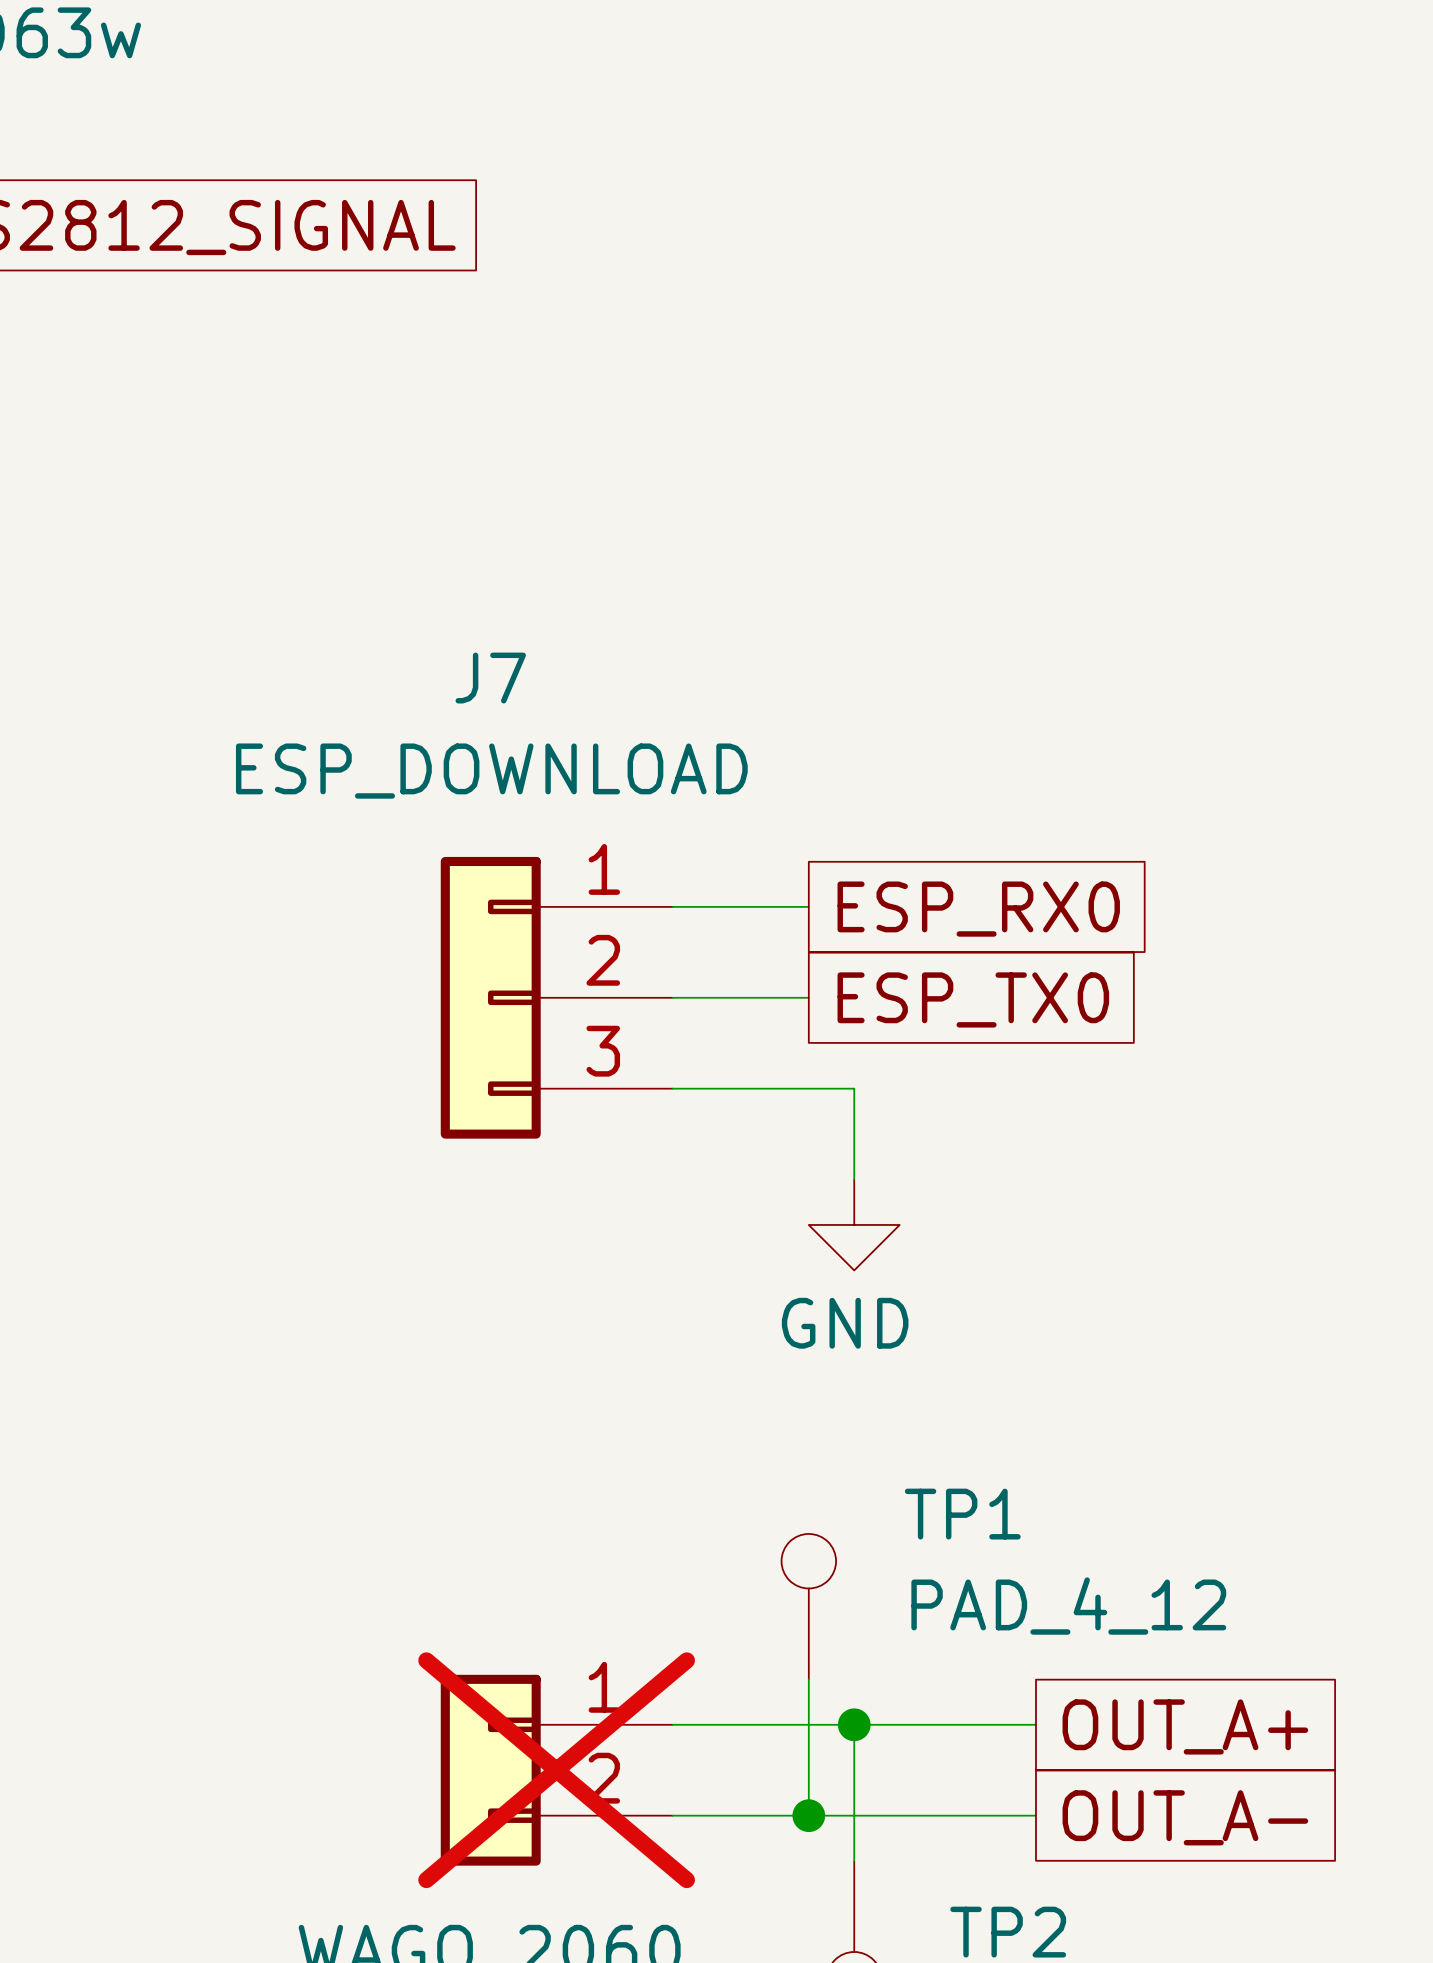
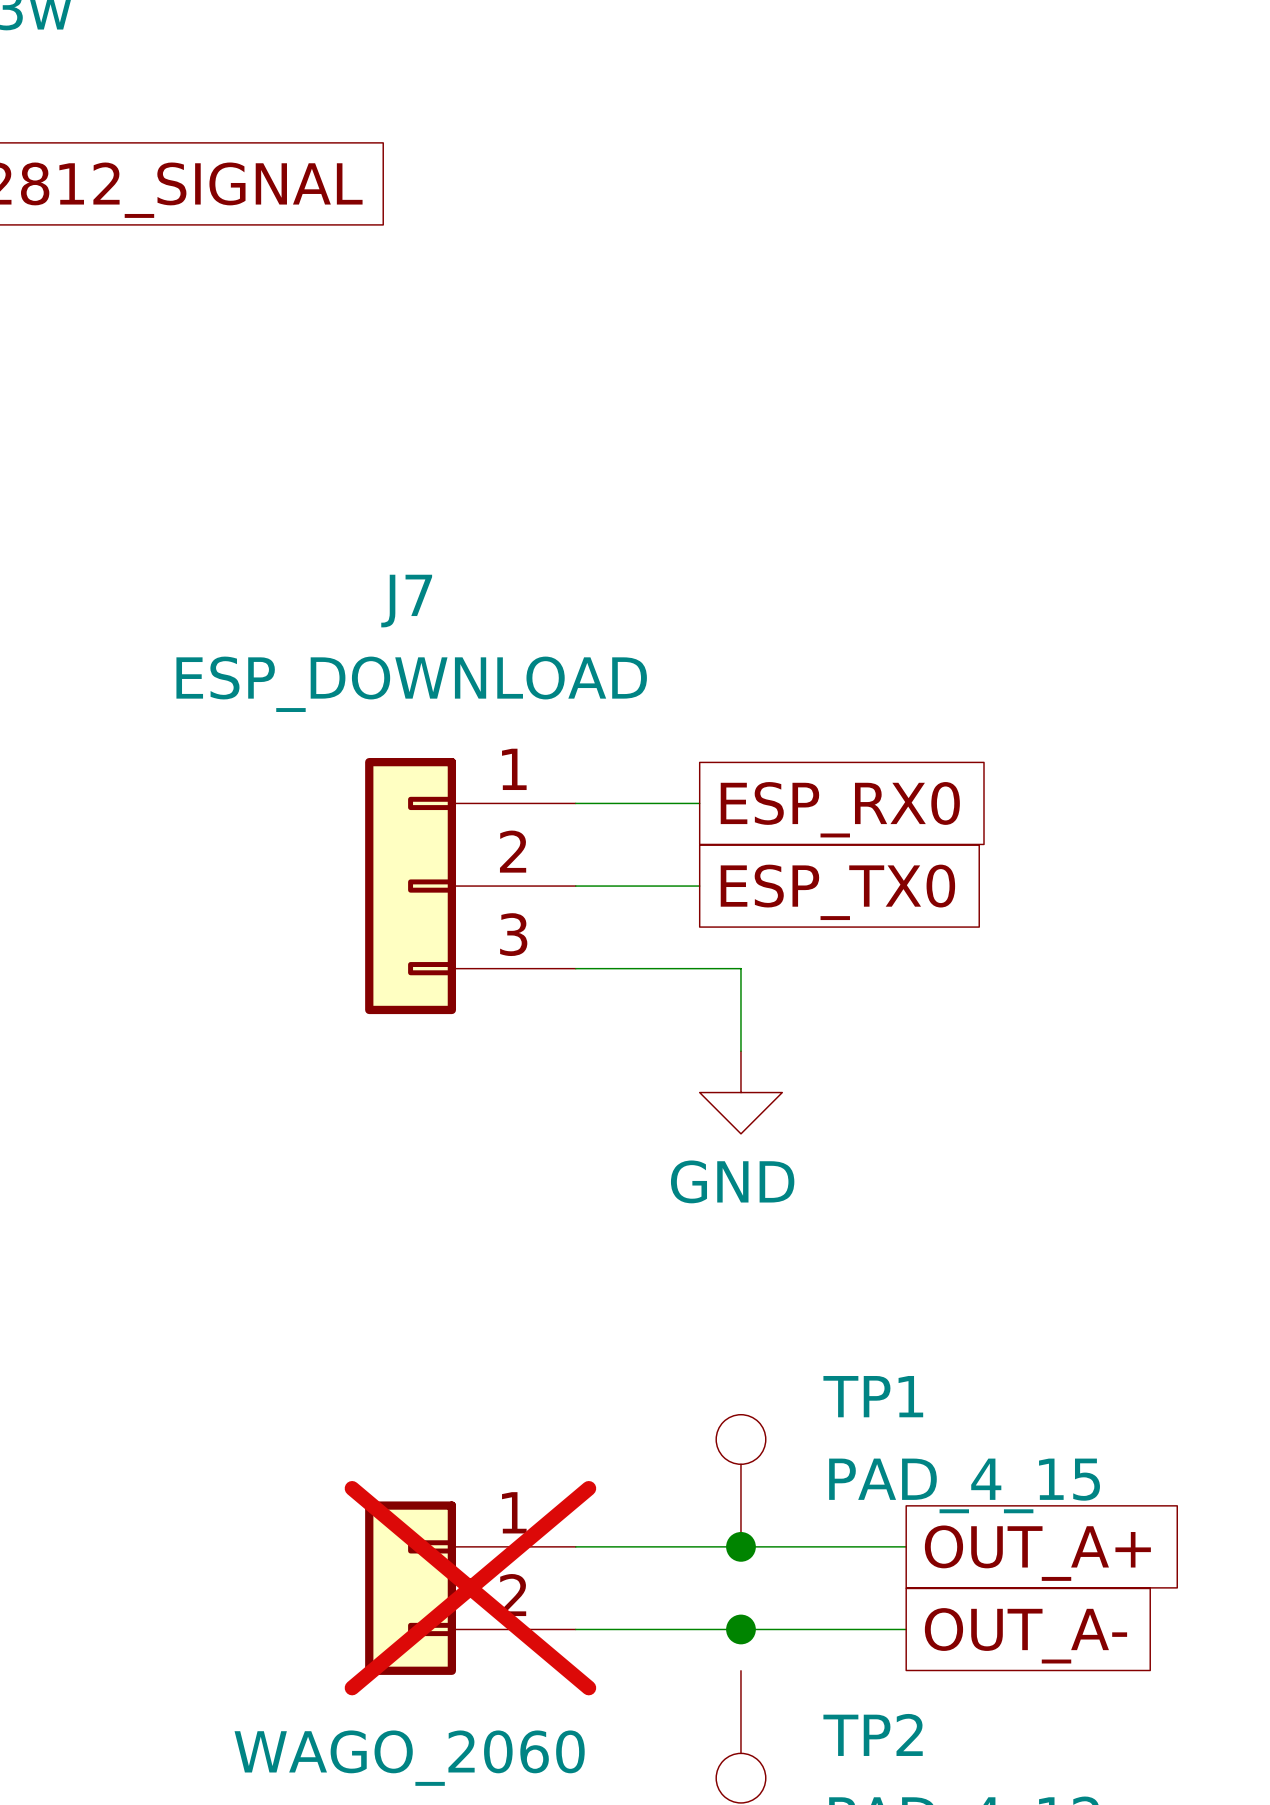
TP1 position: (808, 1606) -> (740, 1480)
TP1 value: PAD_4_12 (1068, 1606) -> PAD_4_15 (964, 1485)
wire: (808, 1679) (808, 1815) -> none
wire: (854, 1724) (854, 1861) -> none
junction position: (808, 1815) -> (740, 1629)

